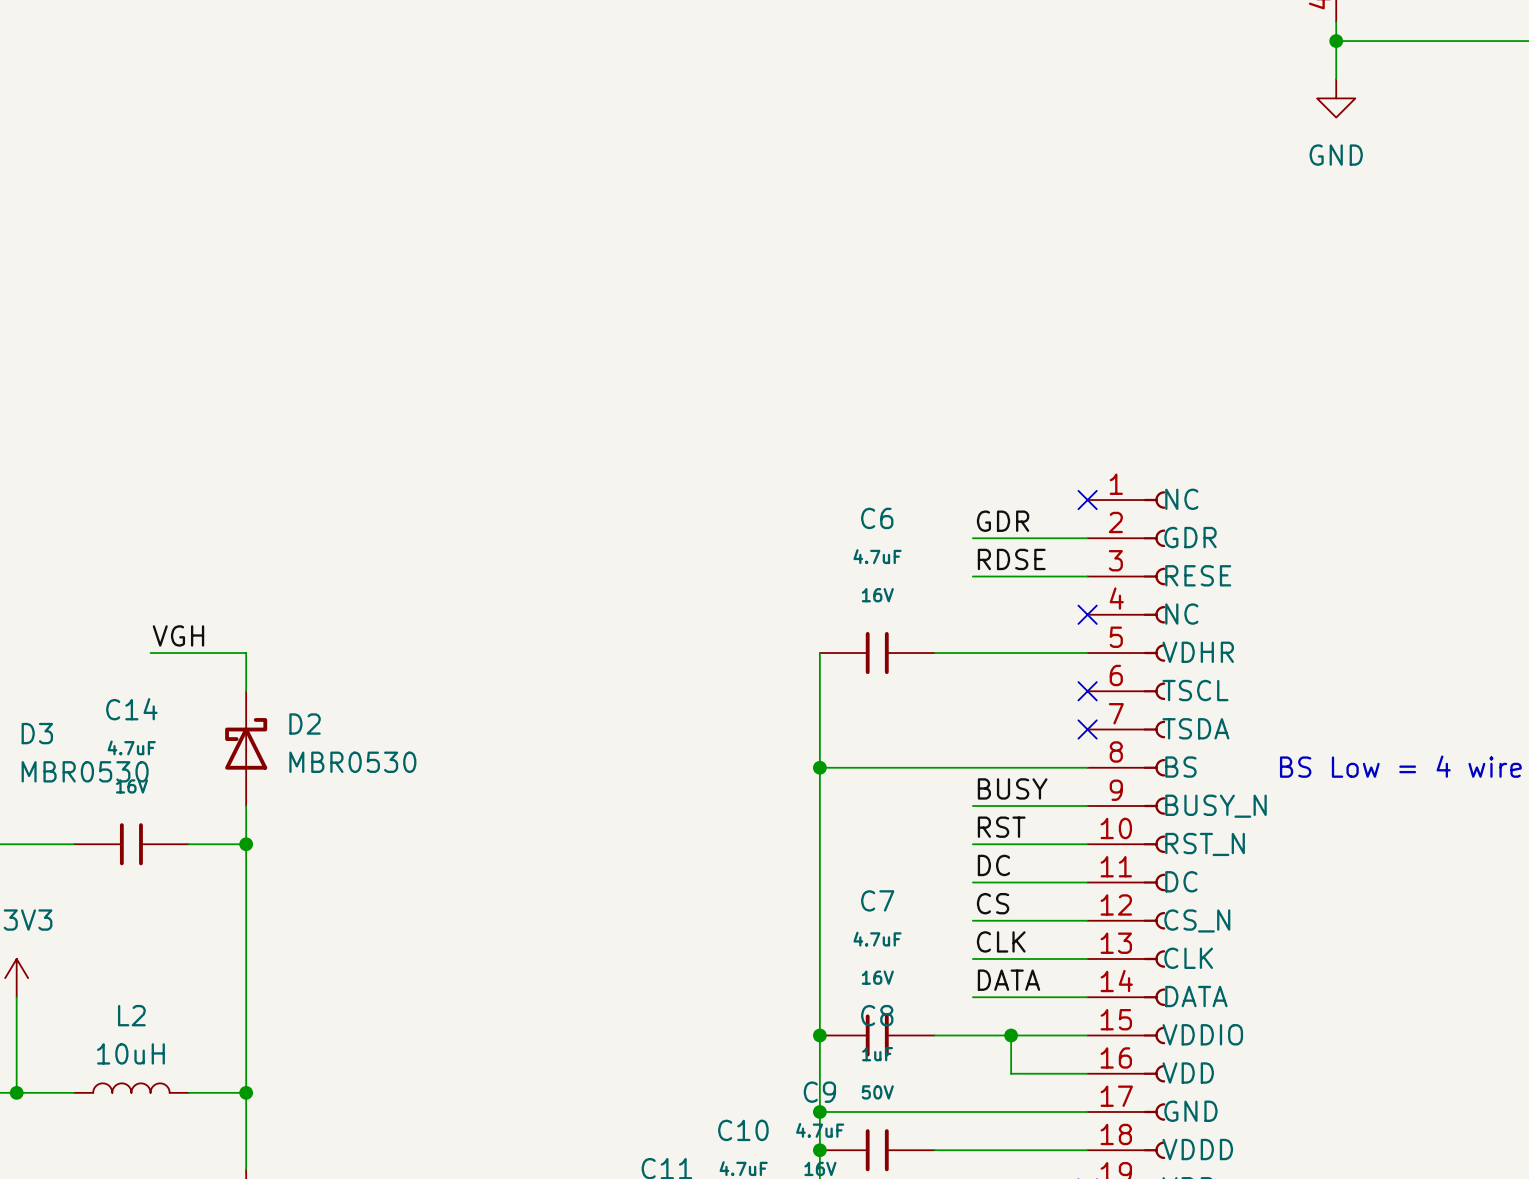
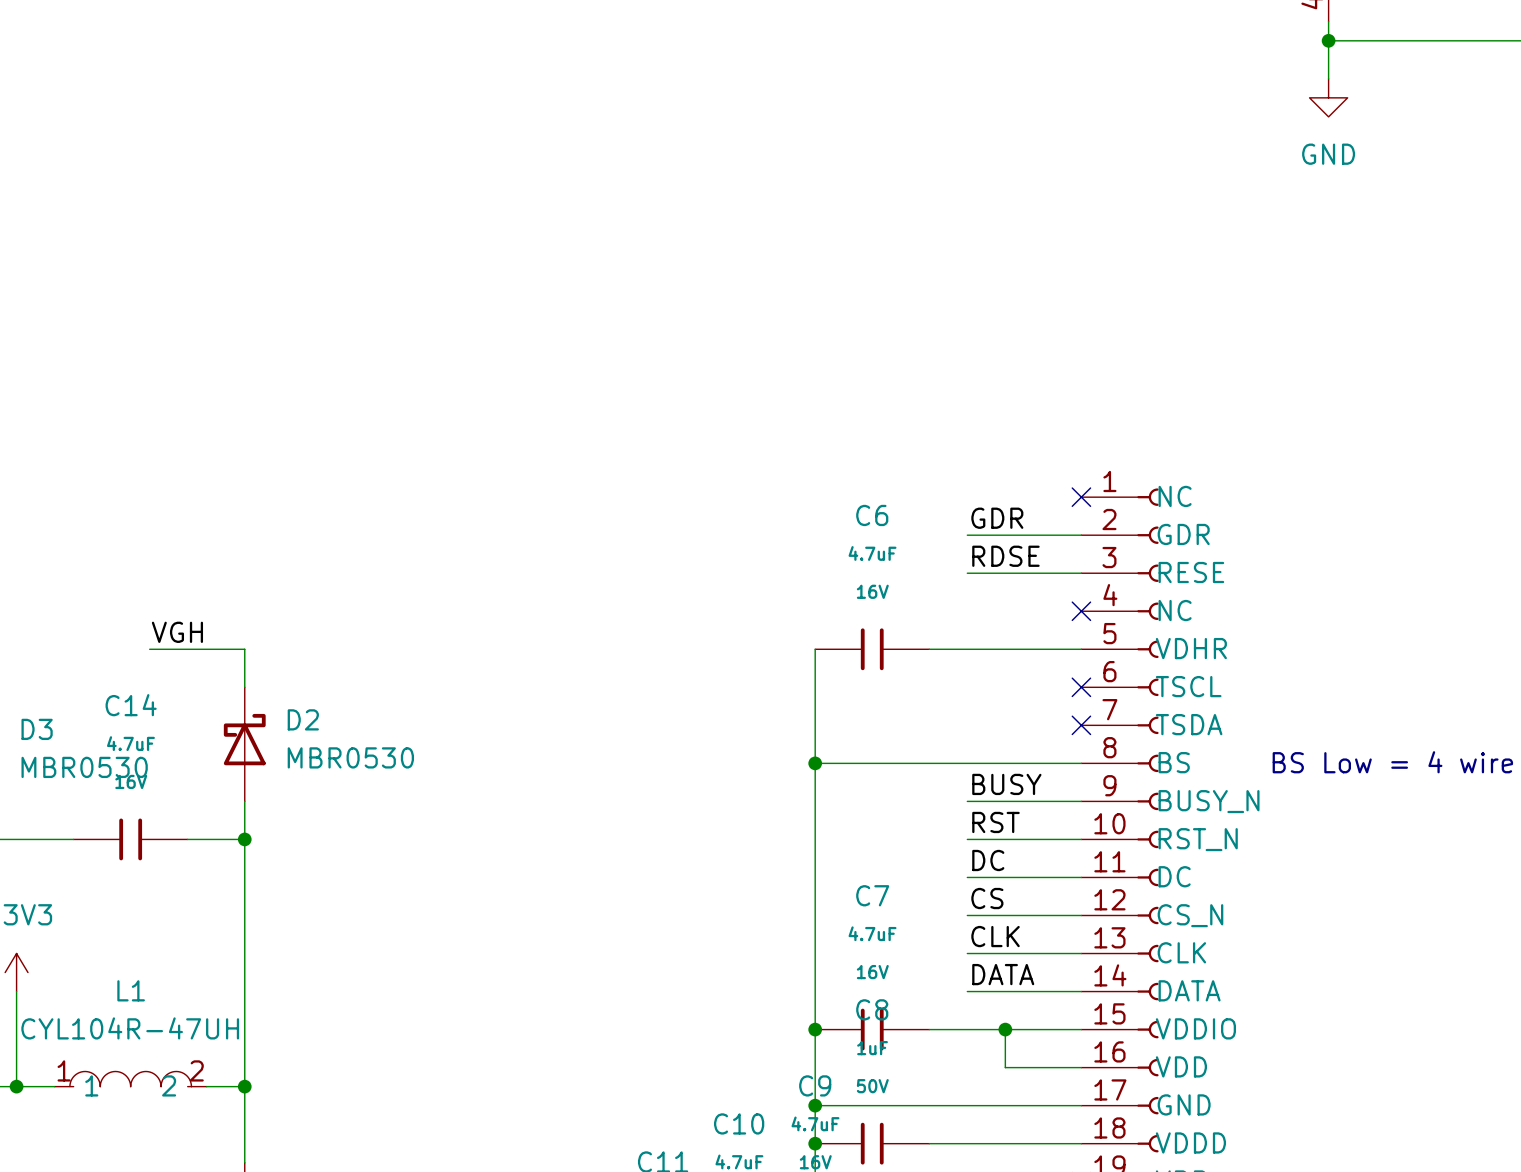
L1: none -> CYL104R-47UH (130, 1079)
L2: 10uH (131, 1088) -> none

